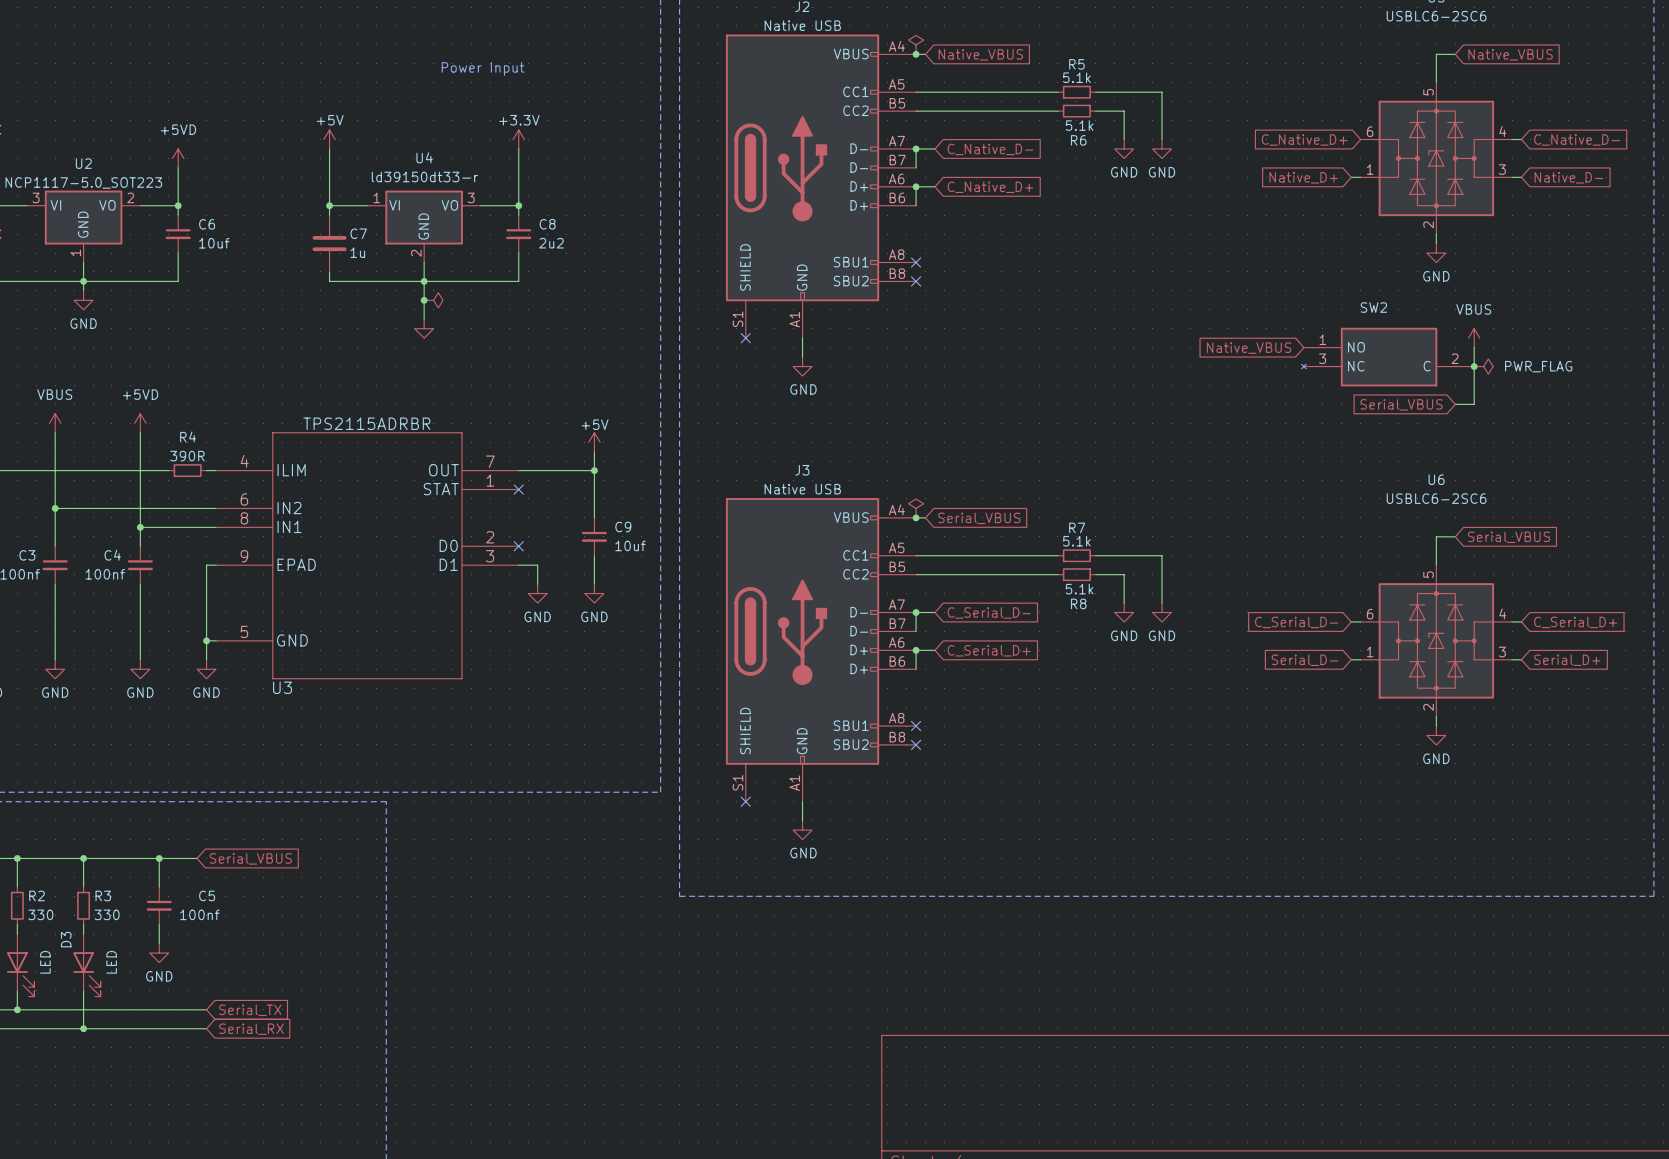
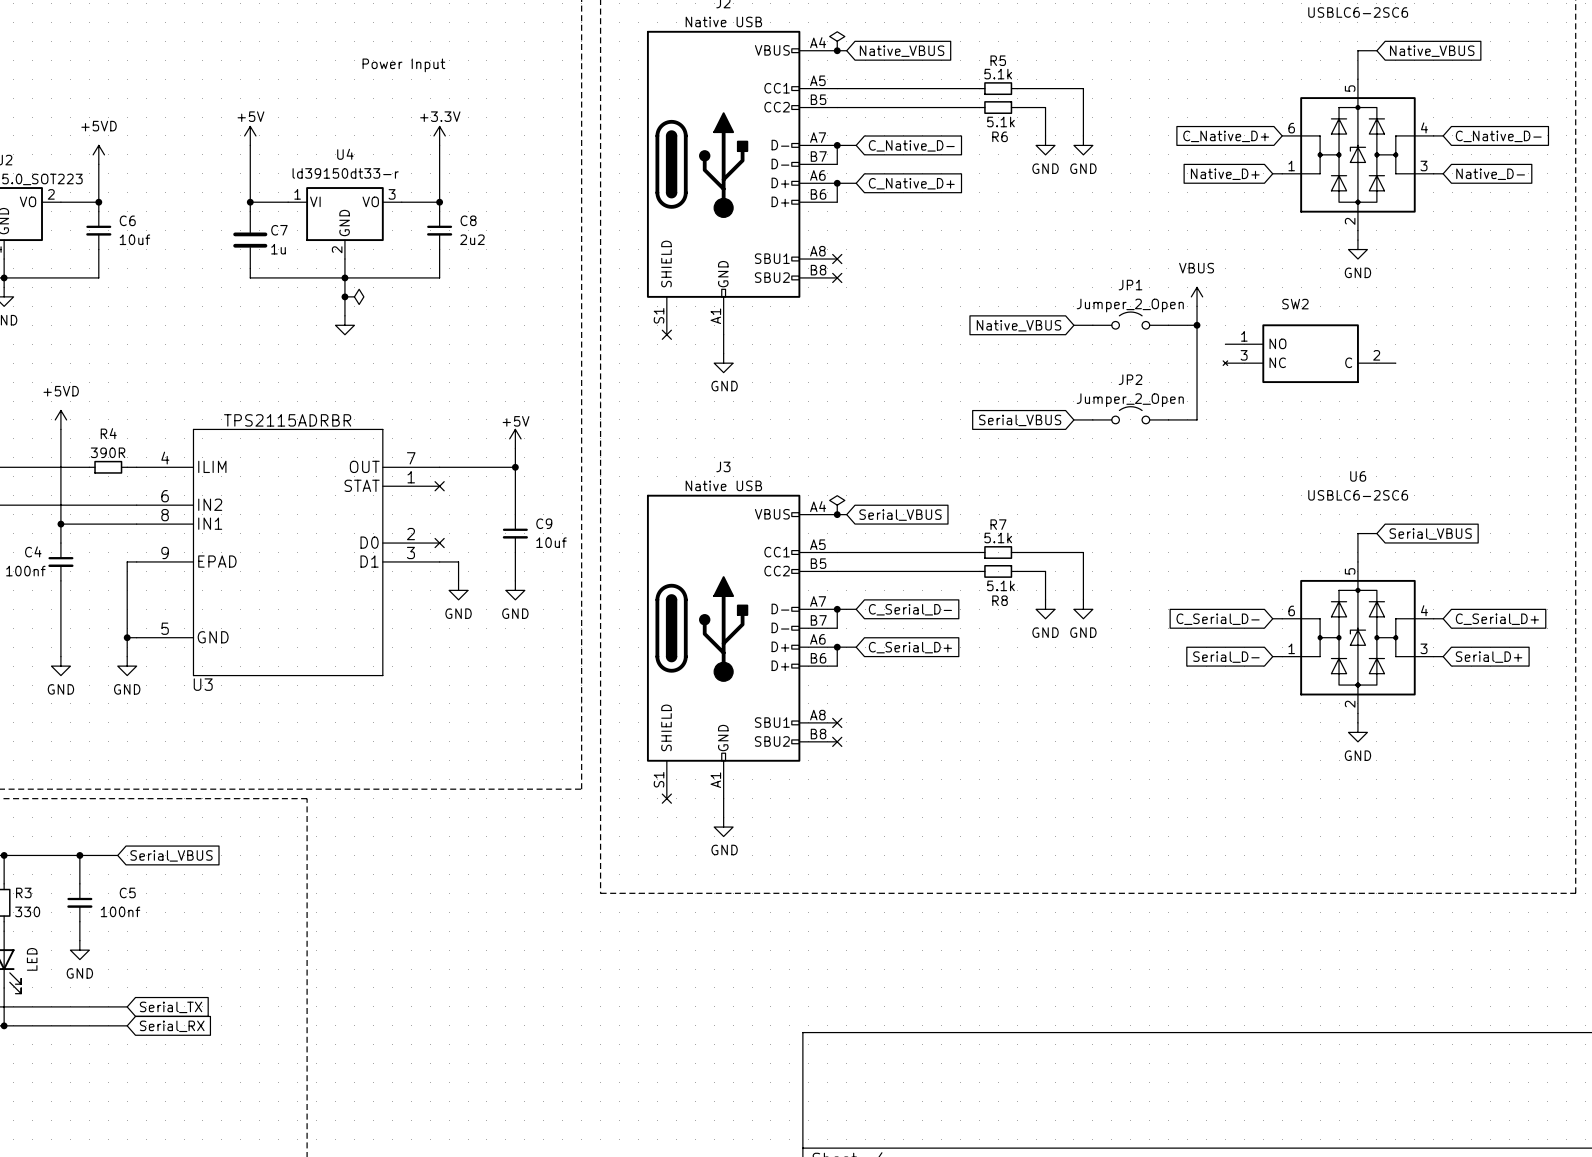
power symbol: none -> VBUS (1197, 296)
wire: none -> (1197, 306) (1197, 419) (1168, 419)
JP1: none -> Jumper_2_Open (1130, 320)
wire: none -> (1073, 325) (1092, 325)
wire: none -> (1168, 325) (1197, 325)
junction: none -> (1197, 325)
power symbol: VBUS (1474, 338) -> none
wire: (1474, 347) (1474, 404) (1455, 404) -> none
global label position: Native_VBUS (1249, 348) -> Native_VBUS (1019, 325)
junction: (1474, 366) -> none
power symbol: PWR_FLAG (1483, 366) -> none
global label: Serial_VBUS (1401, 404) -> none
JP2: none -> Jumper_2_Open (1130, 415)
global label: none -> Serial_VBUS (1020, 420)
wire: none -> (1073, 419) (1092, 419)

